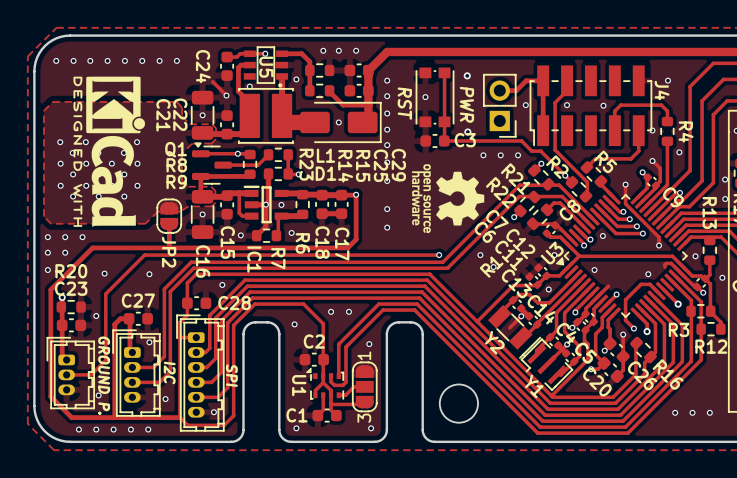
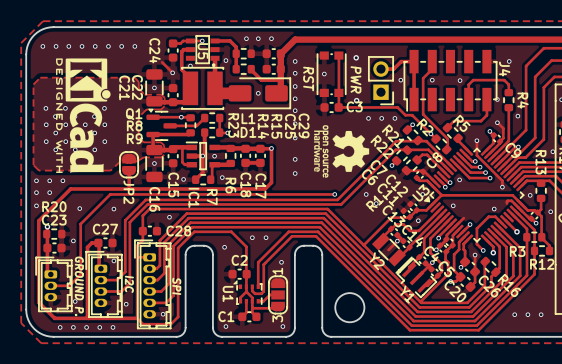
via: (725, 179) -> none

